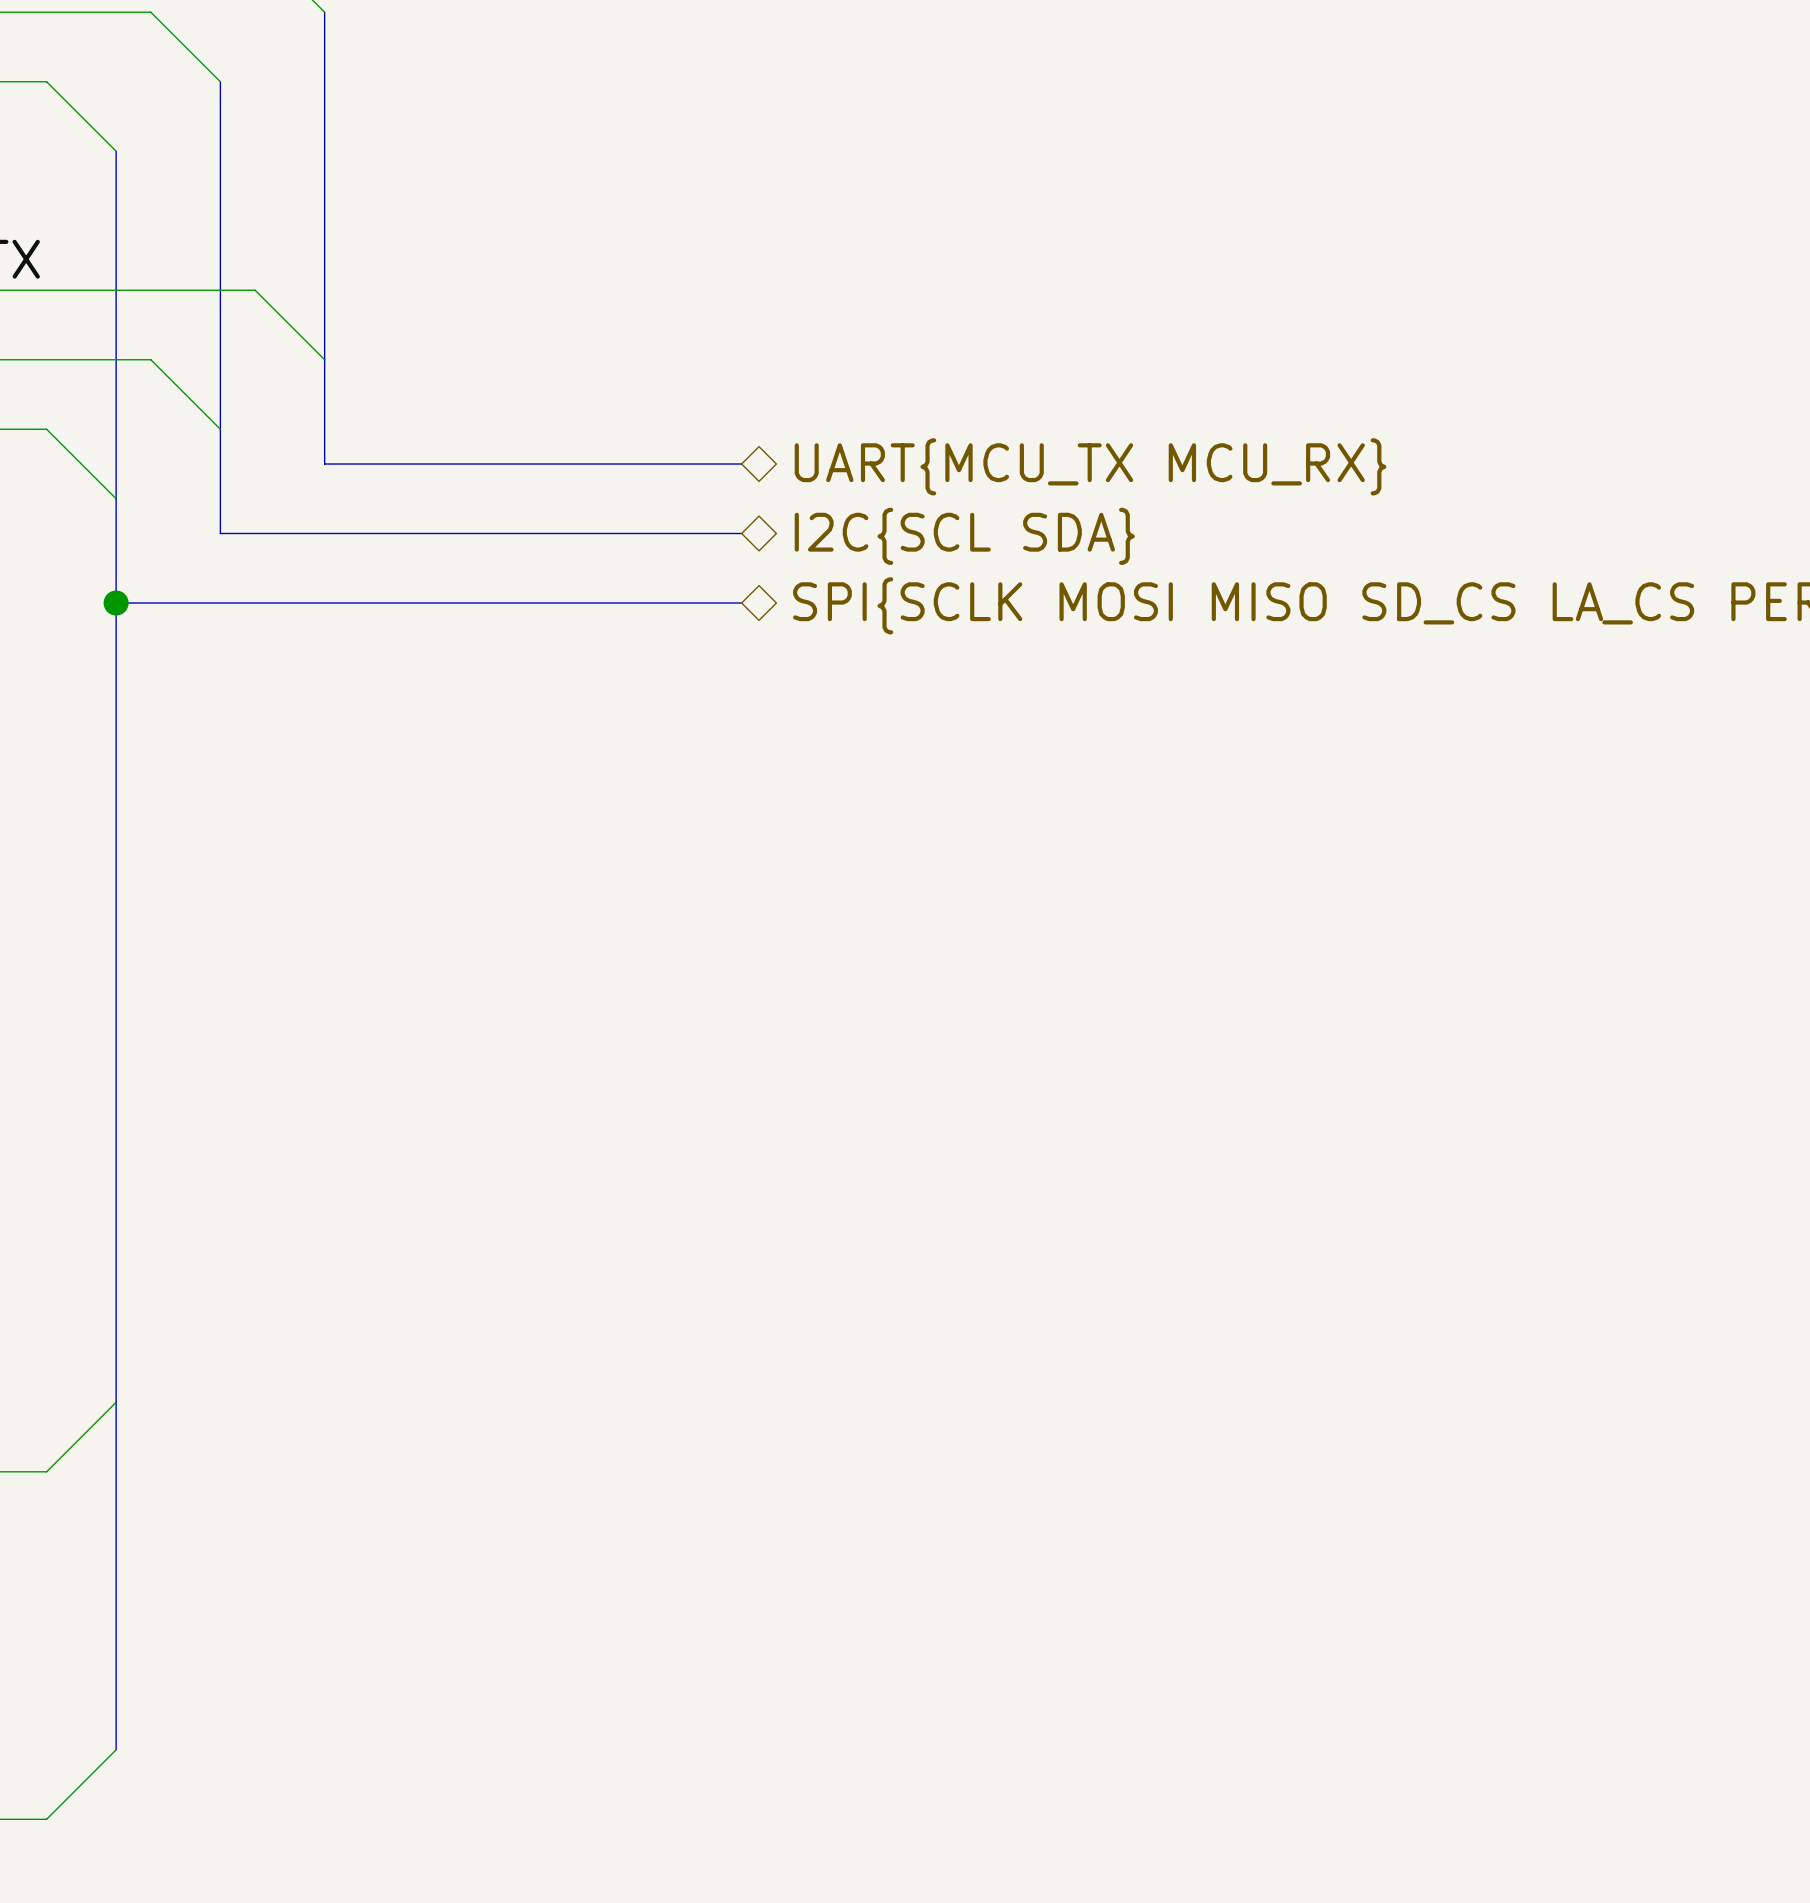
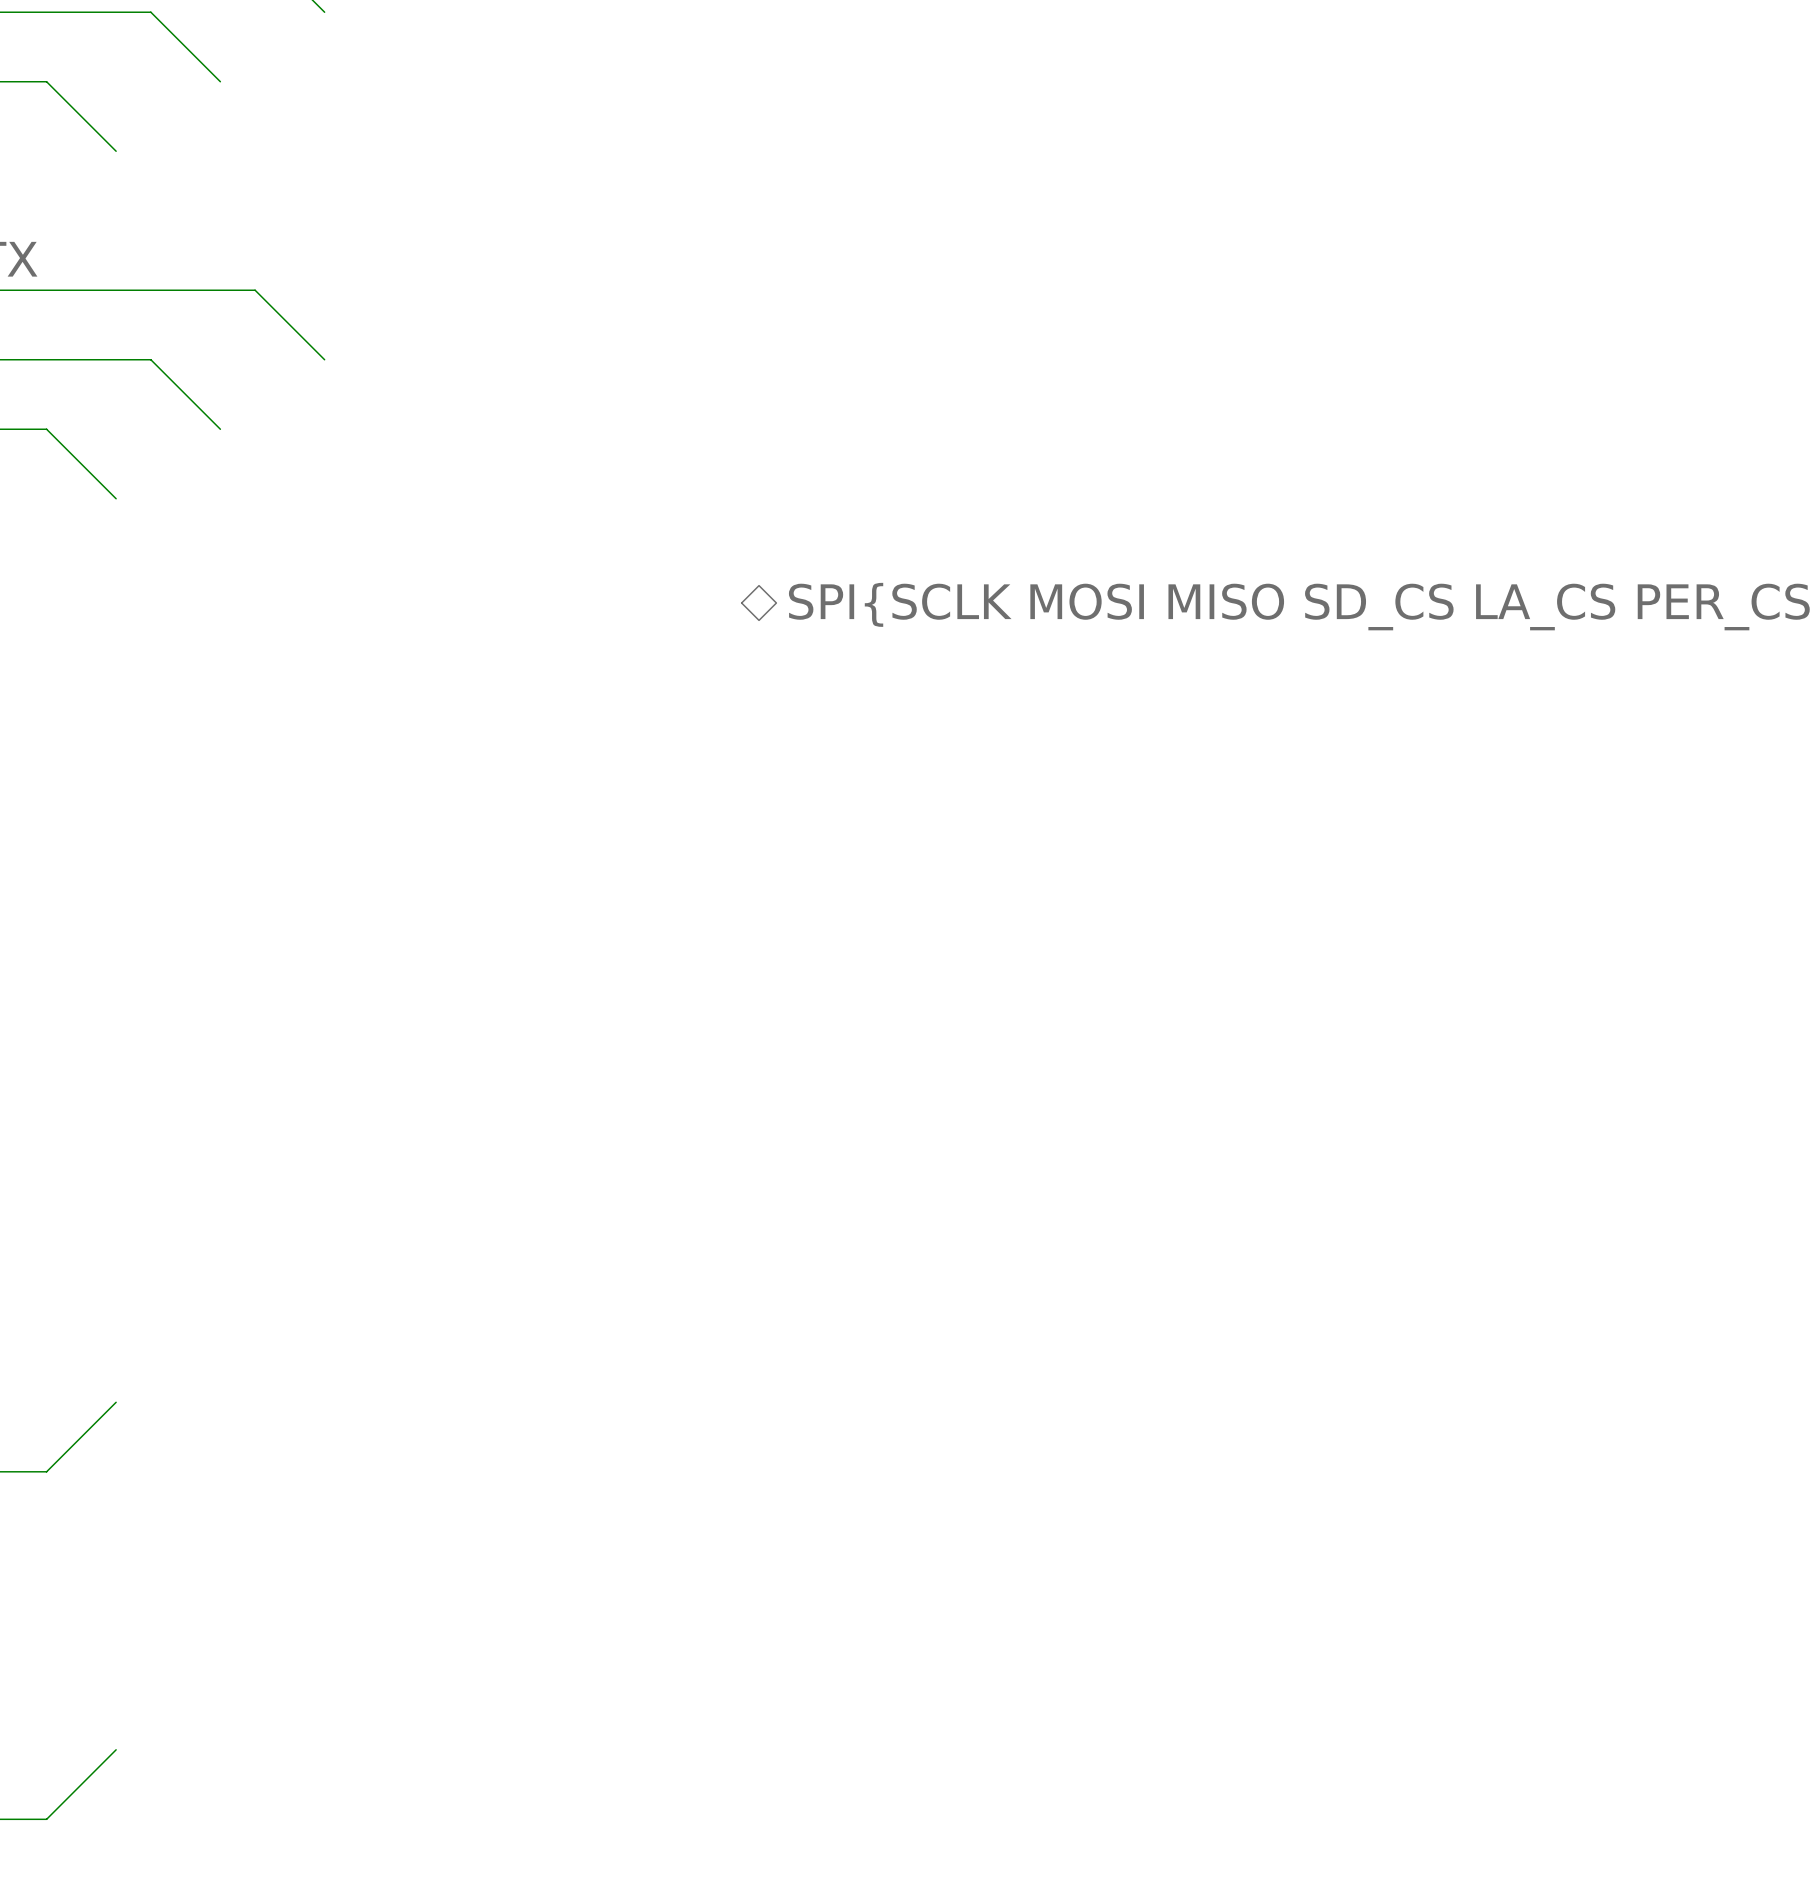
bus: (324, 12) (324, 464) (741, 464) -> none
bus: (220, 81) (220, 533) (741, 533) -> none
bus: (116, 151) (116, 1749) -> none
hierarchical label: UART{MCU_TX MCU_RX} (1090, 466) -> none
hierarchical label: I2C{SCL SDA} (964, 536) -> none
bus: (116, 603) (741, 603) -> none
junction: (116, 603) -> none

